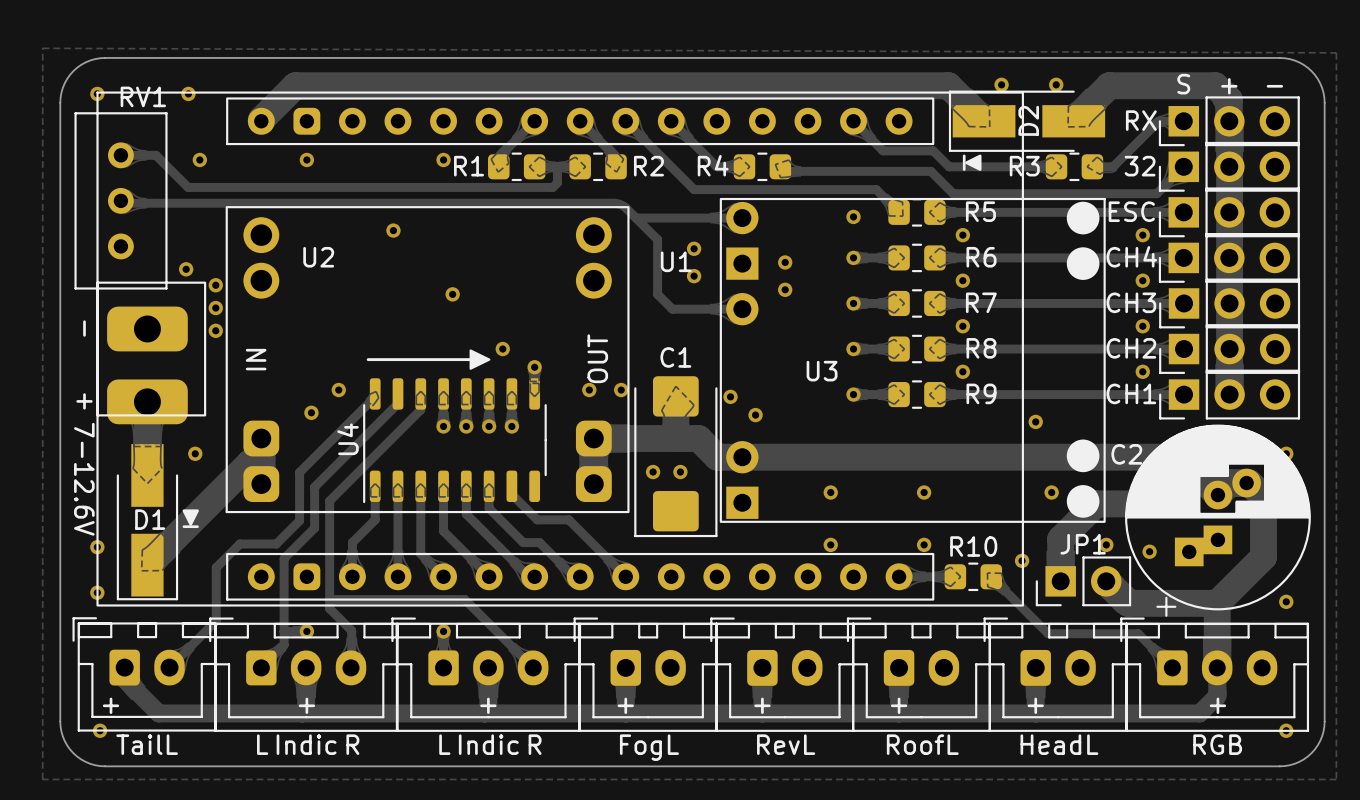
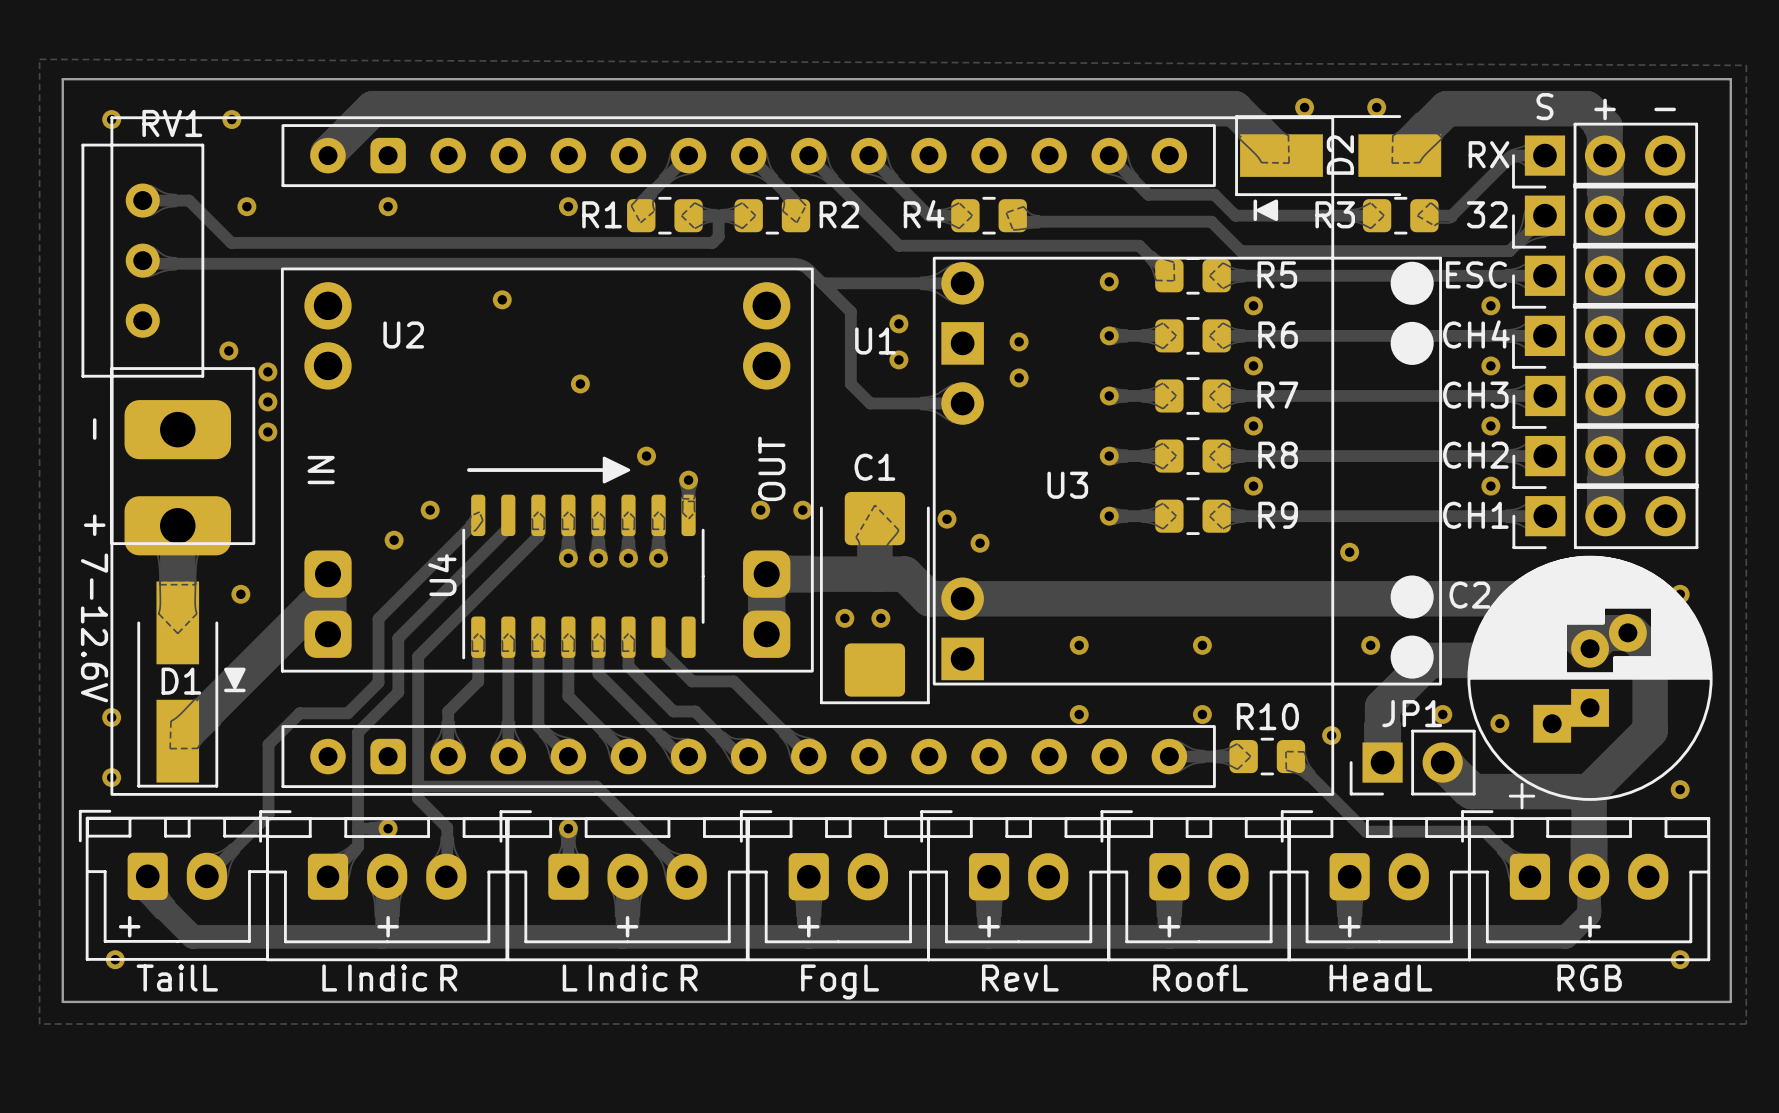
board edge: (60, 102) (62, 87) (73, 71) (90, 60) (105, 57) (1279, 57) (1294, 60) (1311, 71) (1320, 83) (1324, 102) -> (62, 131) (62, 79) (1730, 79) (1730, 131)
board edge: (60, 721) (64, 740) (73, 753) (90, 763) (105, 766) (1279, 766) (1294, 763) (1311, 753) (1322, 736) (1324, 721) -> (62, 947) (62, 1001) (1730, 1001) (1730, 947)

